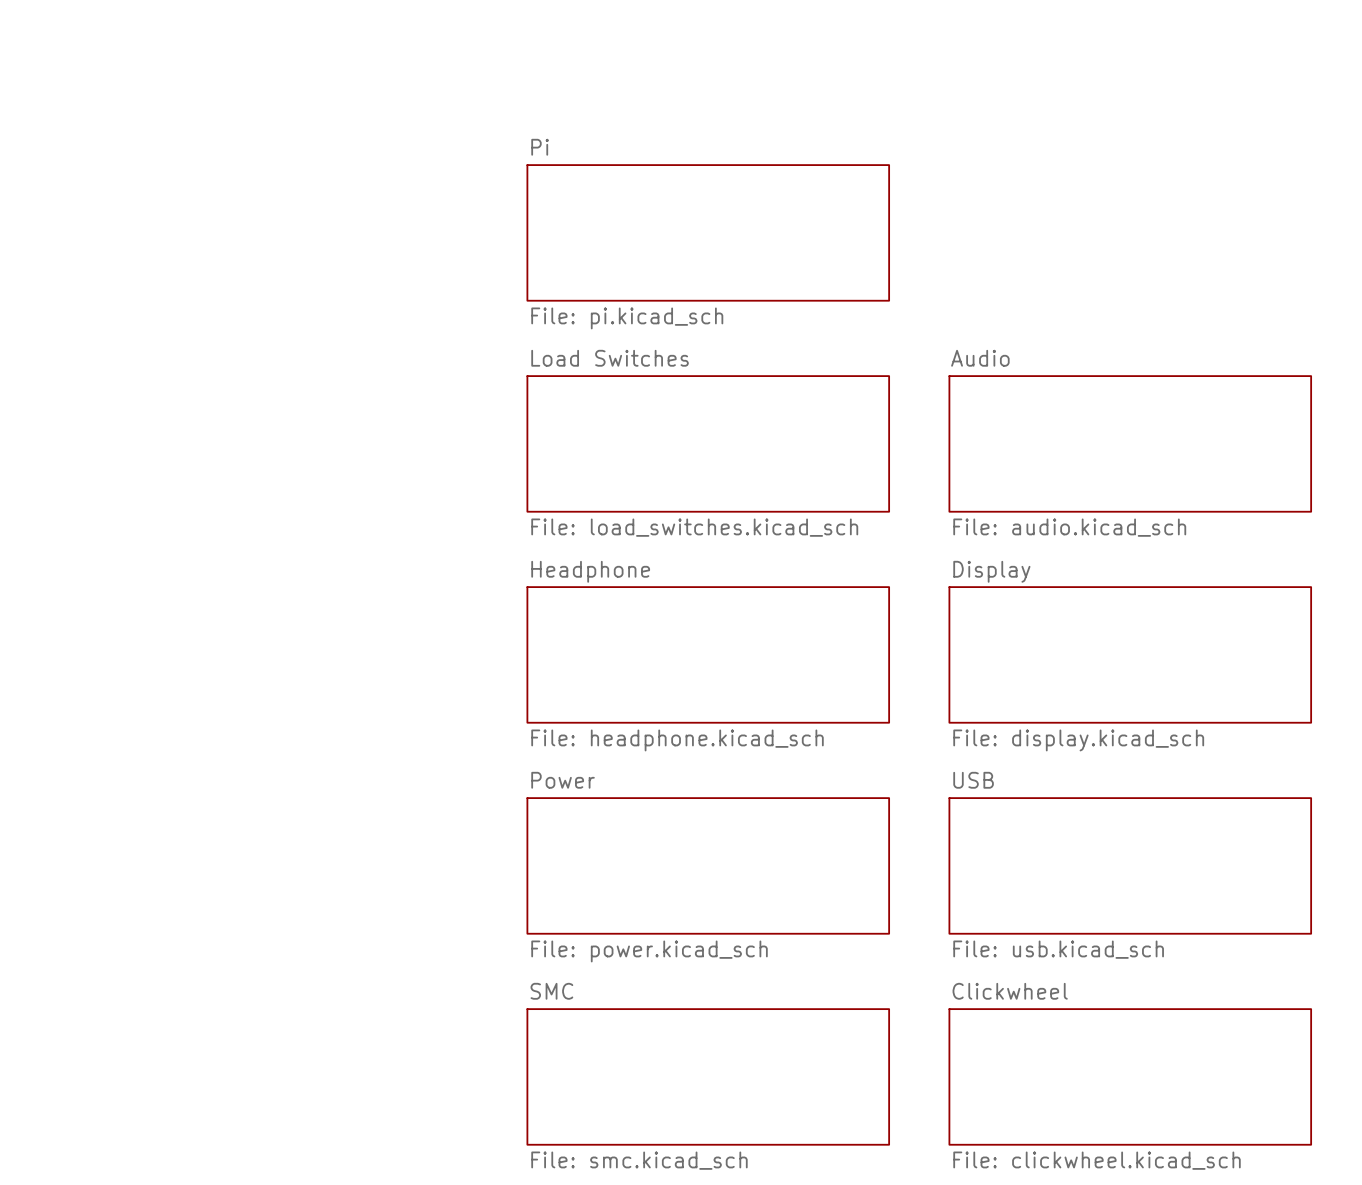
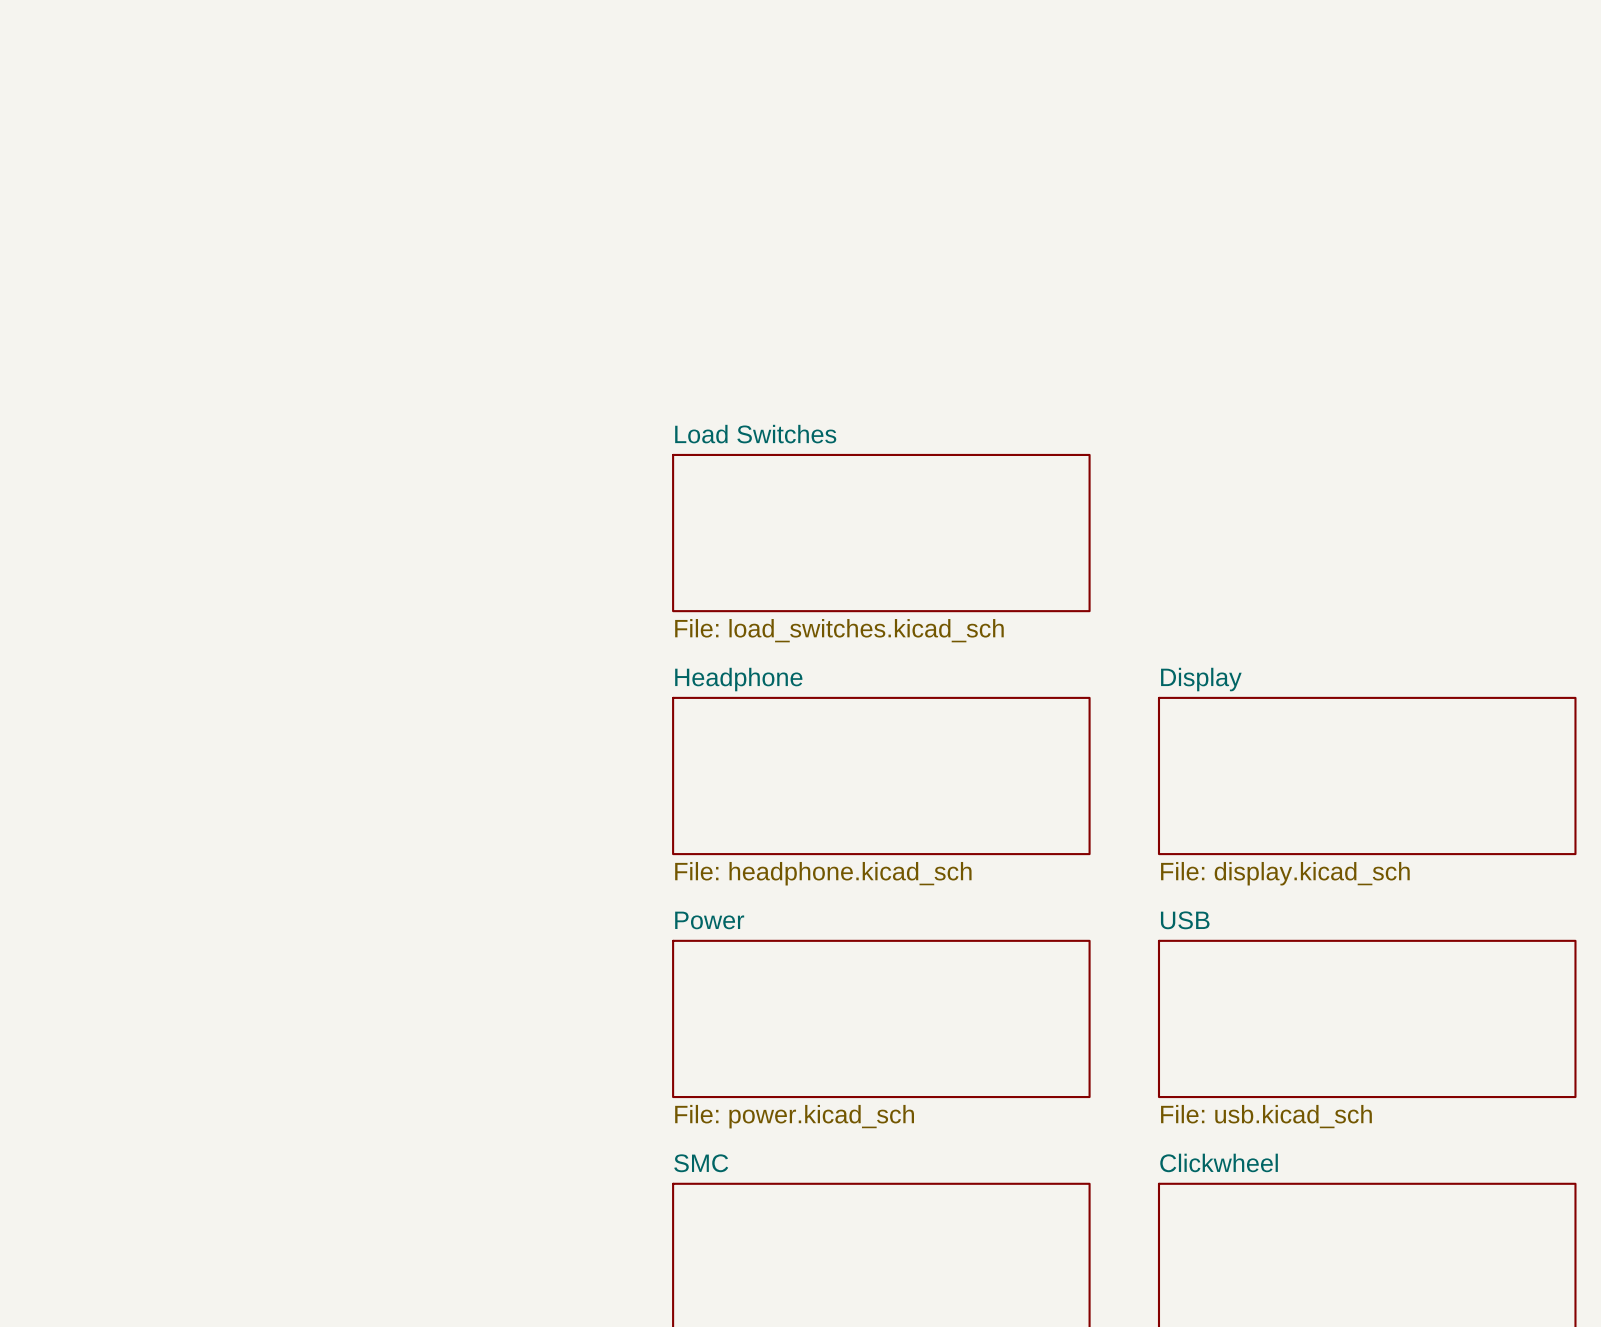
sheet Pi: File: pi.kicad_sch (708, 232) -> none
sheet Audio: File: audio.kicad_sch (1130, 443) -> none

